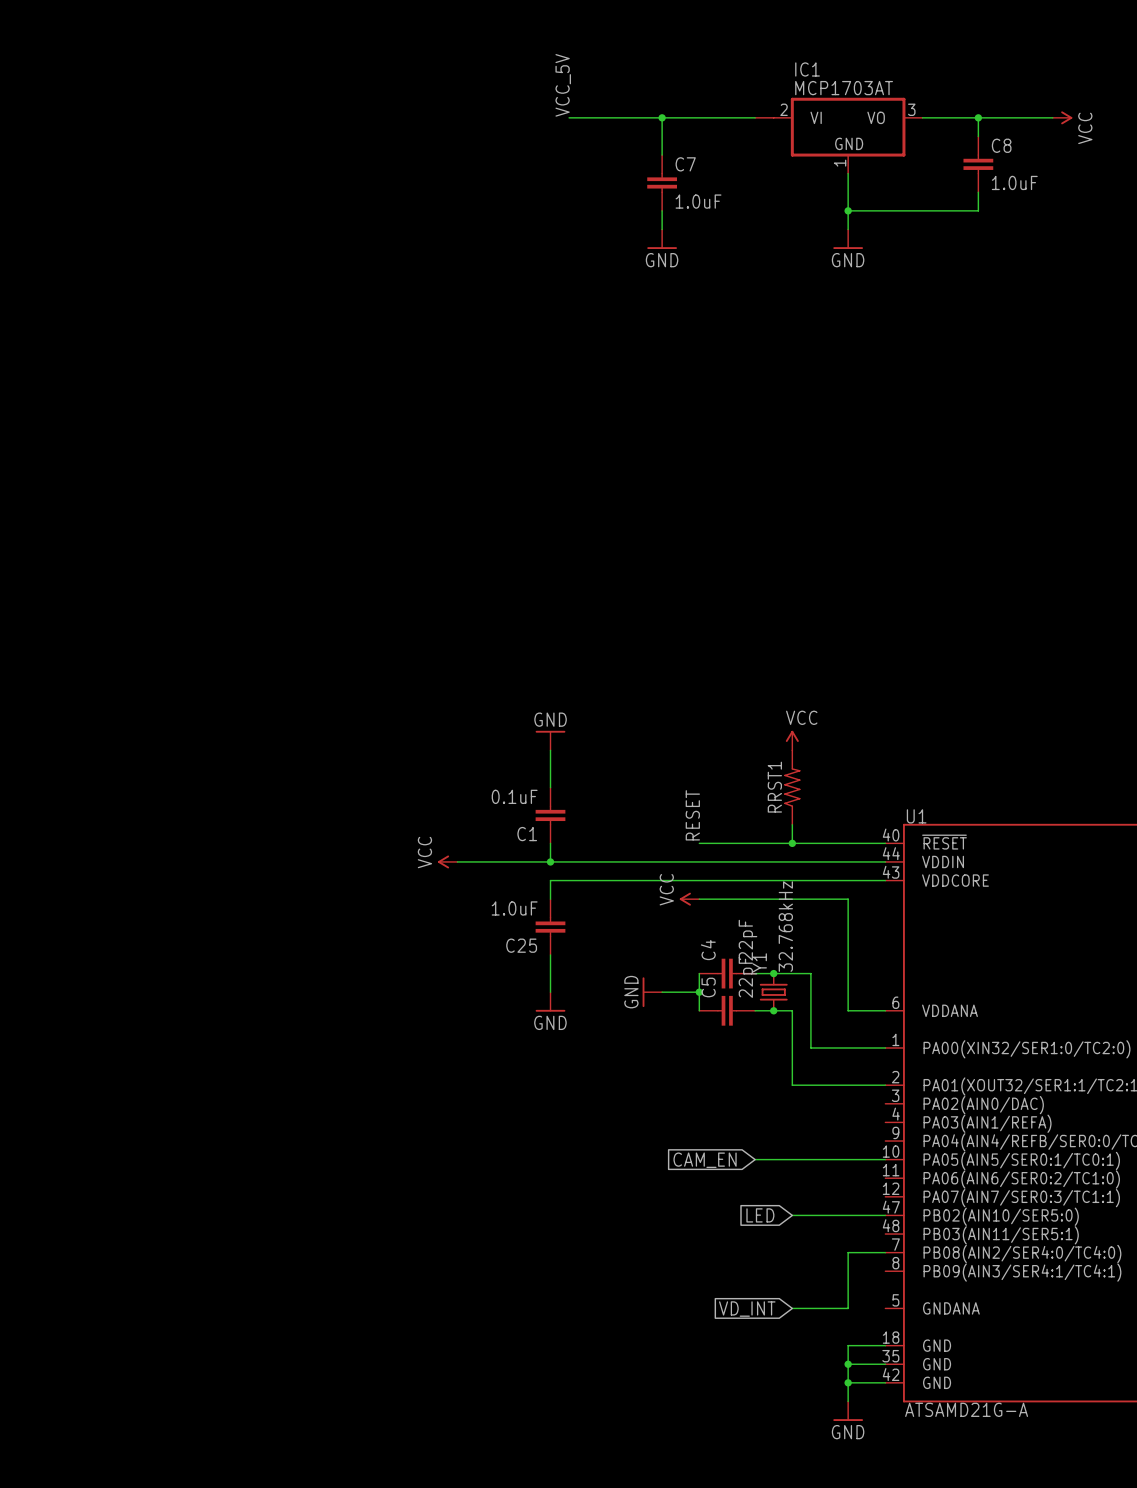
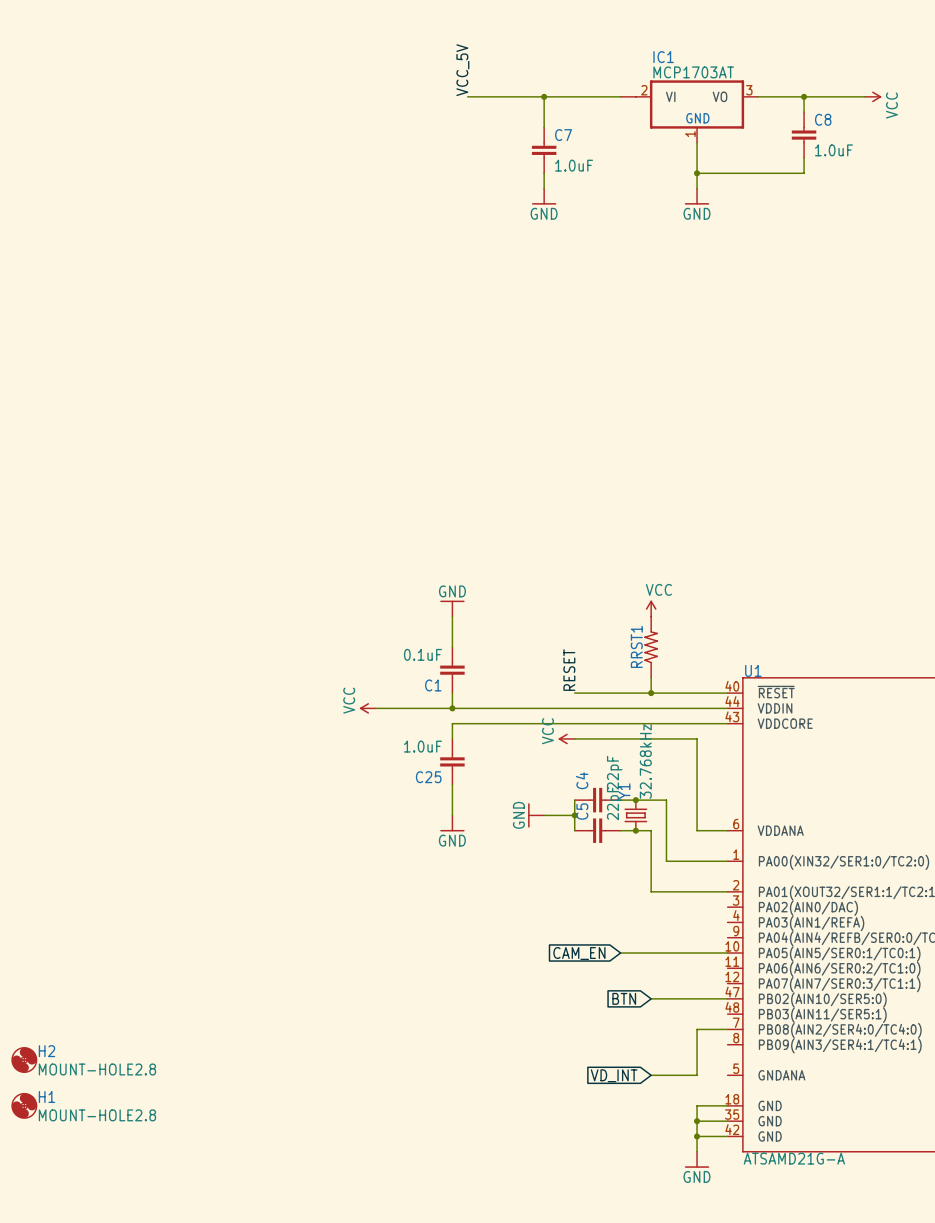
global label: LED (760, 1215) -> BTN (624, 998)
H2: none -> MOUNT-HOLE2.8 (24, 1060)
H1: none -> MOUNT-HOLE2.8 (24, 1105)

